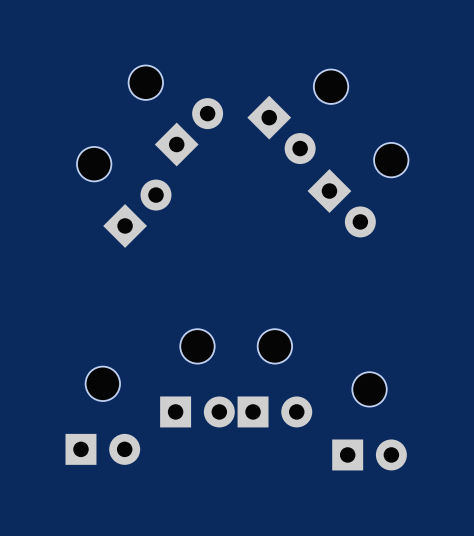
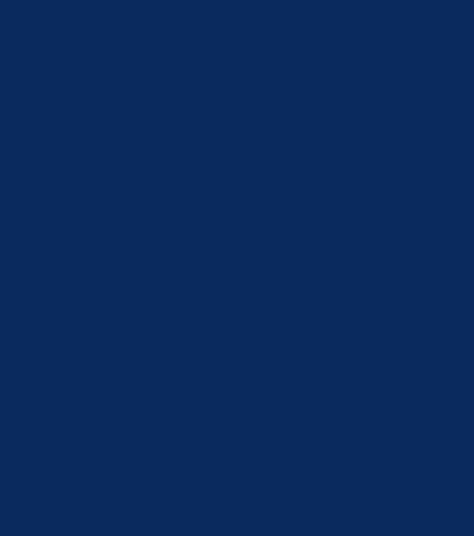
part: (175, 115) -> none
part: (297, 116) -> none
part: (358, 190) -> none
part: (124, 197) -> none
part: (197, 378) -> none
part: (274, 378) -> none
part: (102, 415) -> none
part: (369, 421) -> none

